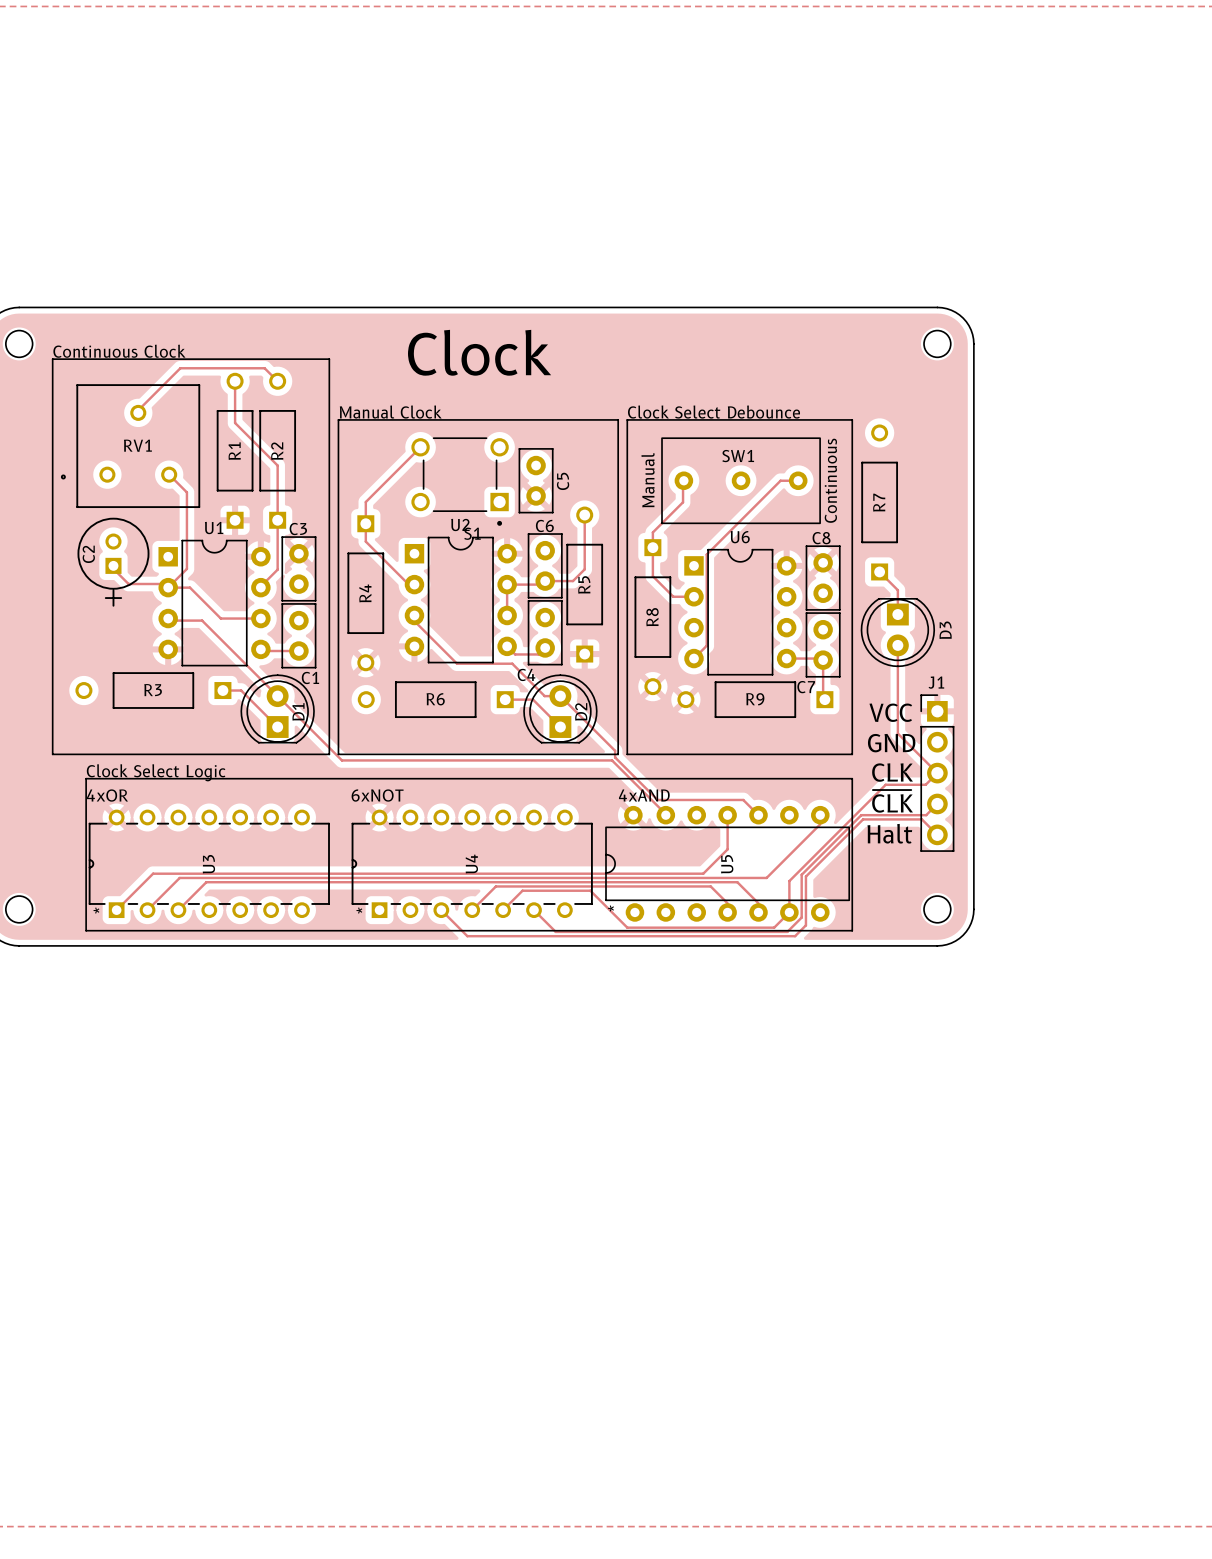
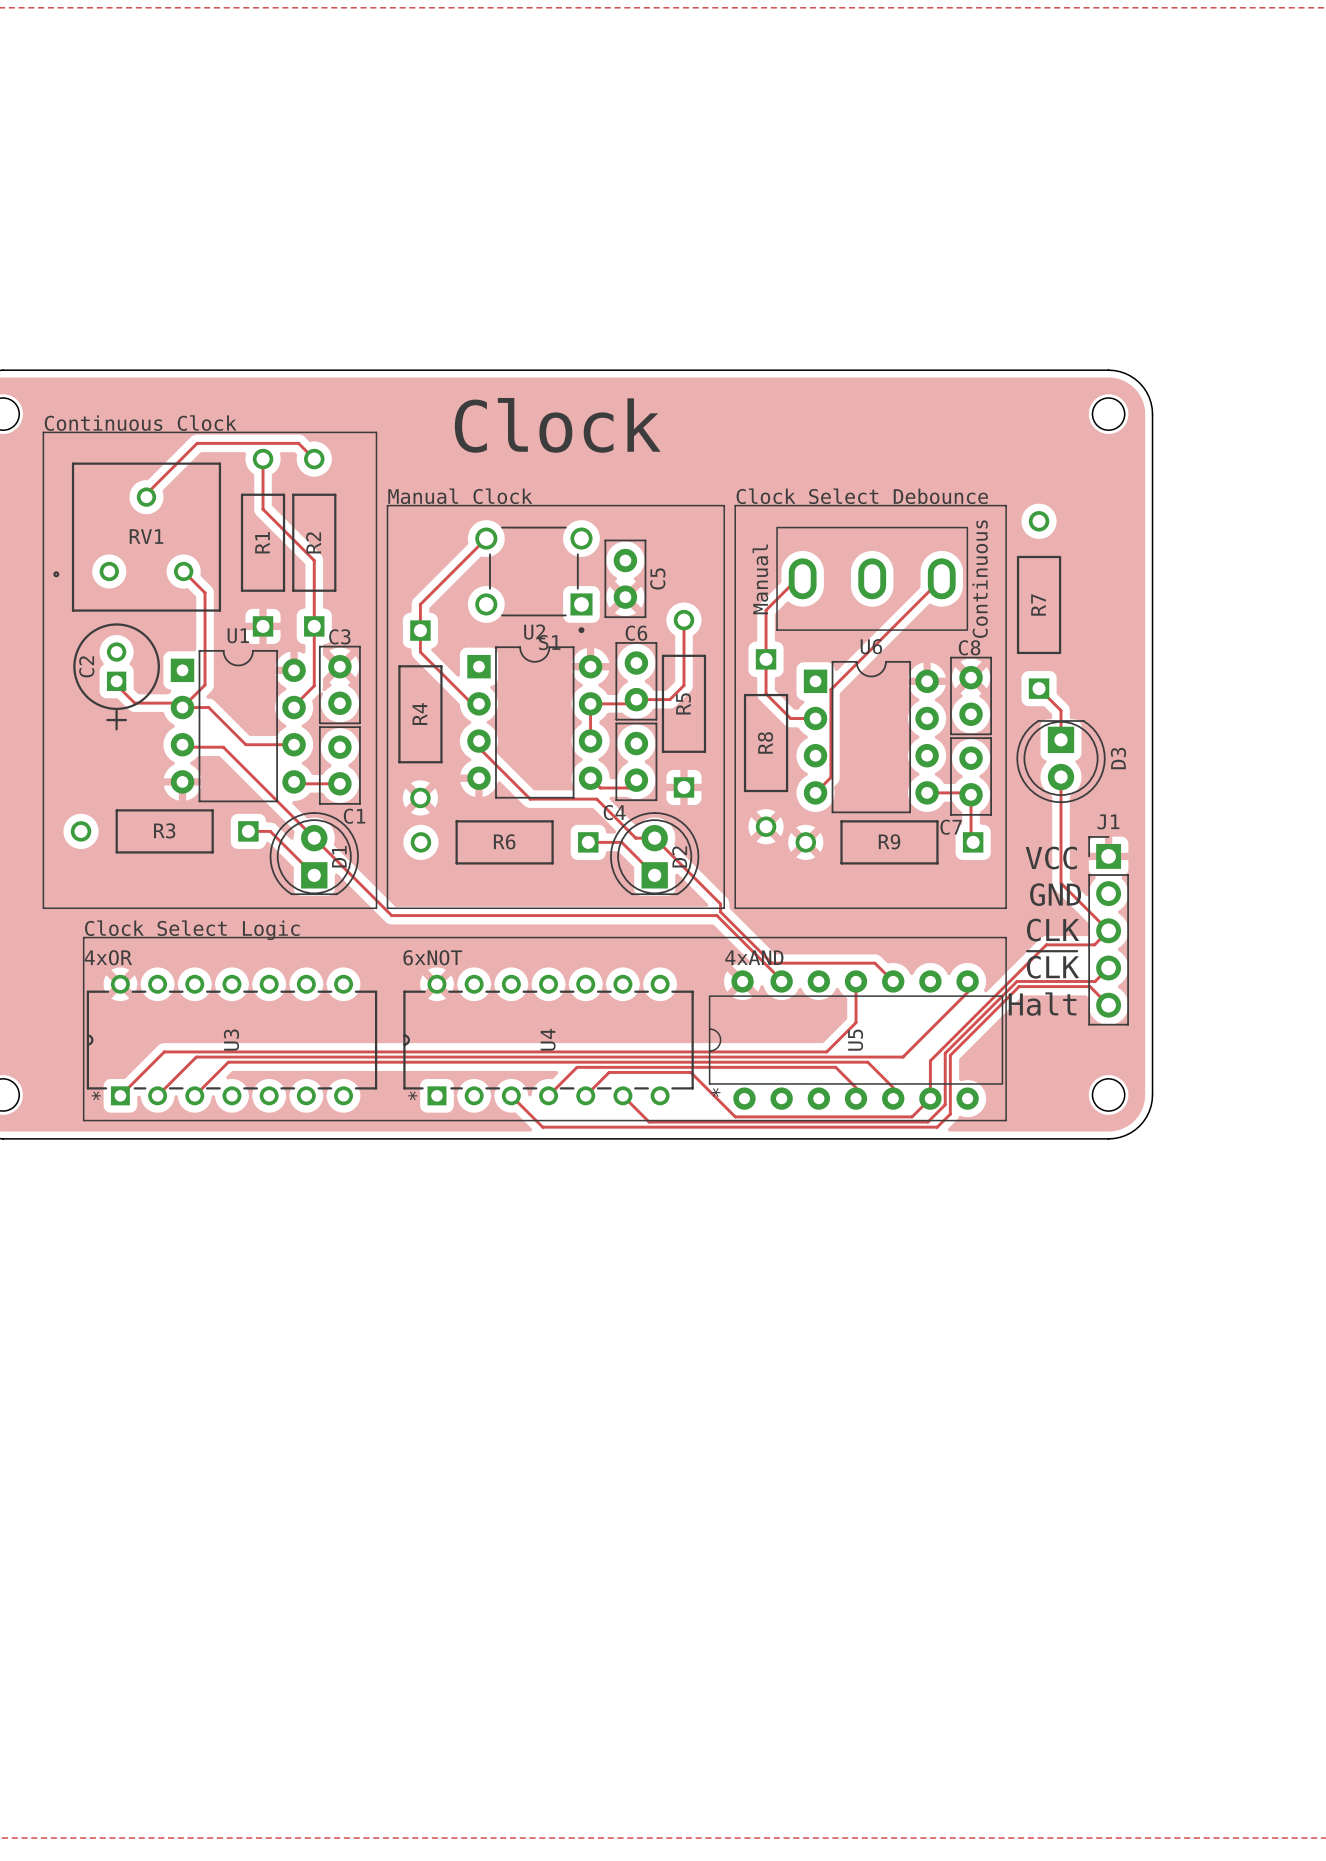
track: (683, 480) (683, 502) (652, 532) -> (802, 578) (797, 578) (766, 610) (766, 641)
SW1: (741, 480) -> none
part: none -> (872, 578)
track: (798, 480) (780, 480) (706, 554) (706, 572) -> (941, 578) (830, 689)

